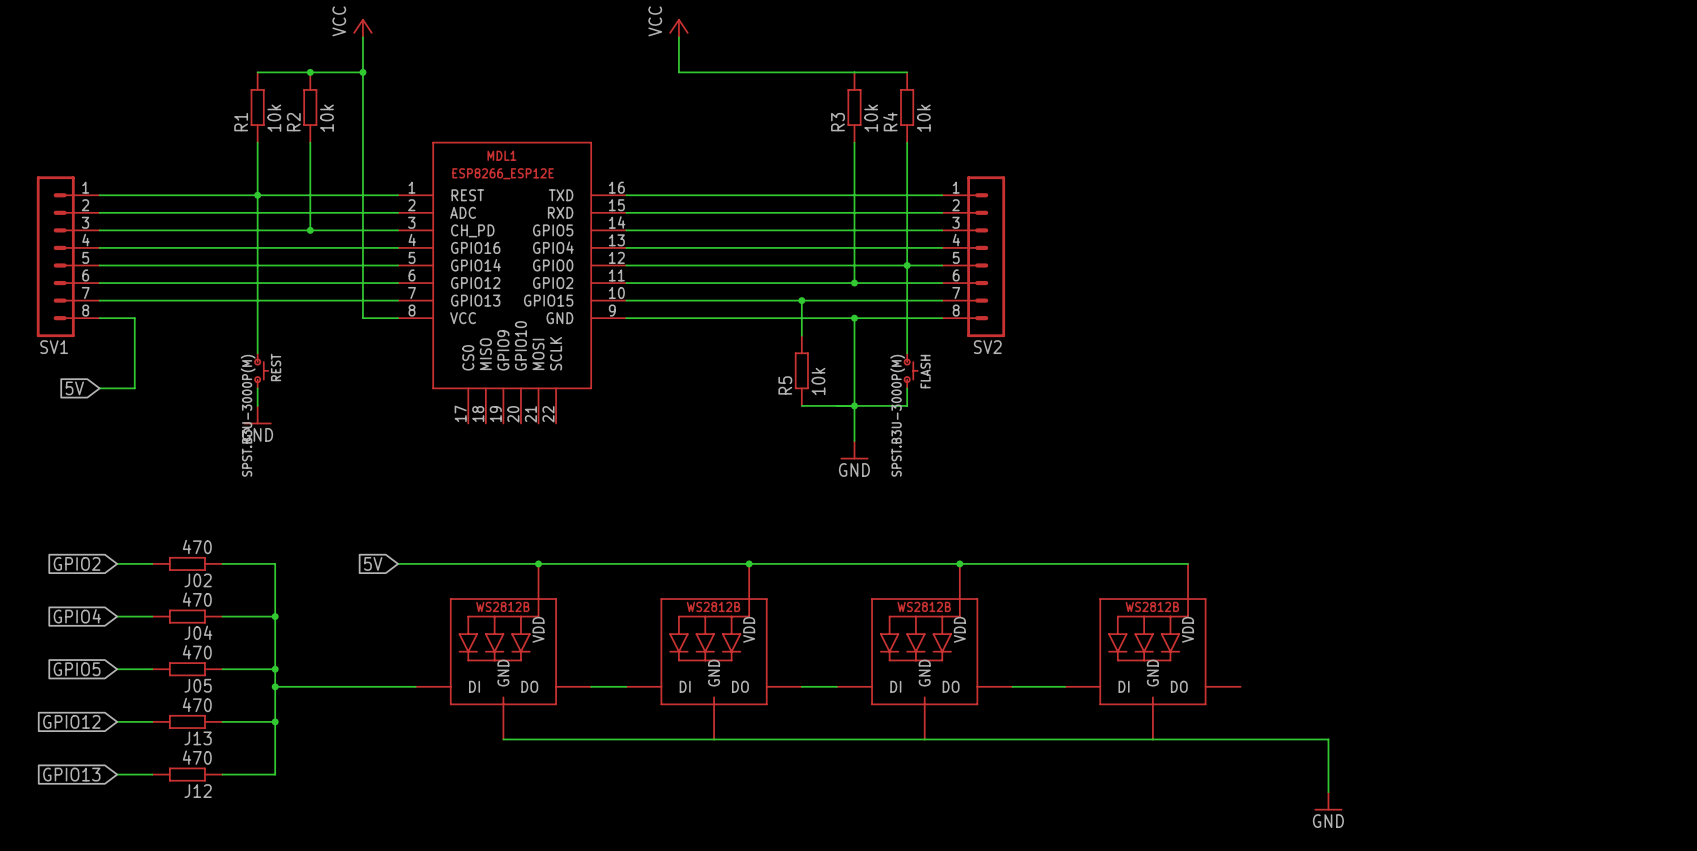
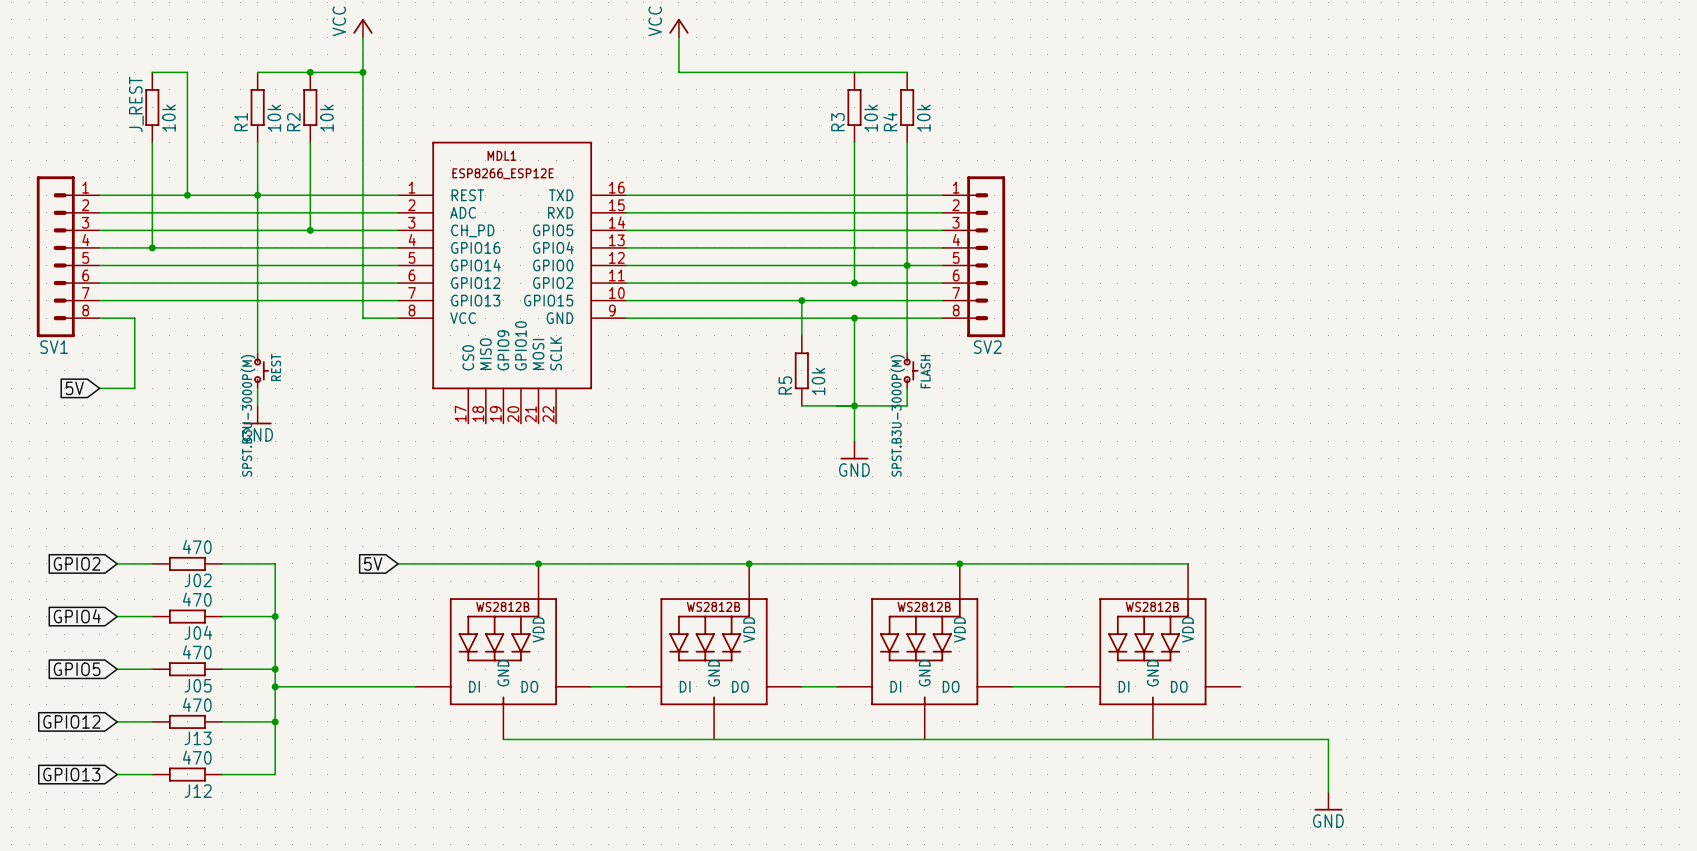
wire: none -> (152, 72) (187, 72) (187, 195)
J_REST: none -> 10k (152, 107)
wire: none -> (152, 142) (152, 247)
junction: none -> (187, 195)
junction: none -> (152, 247)

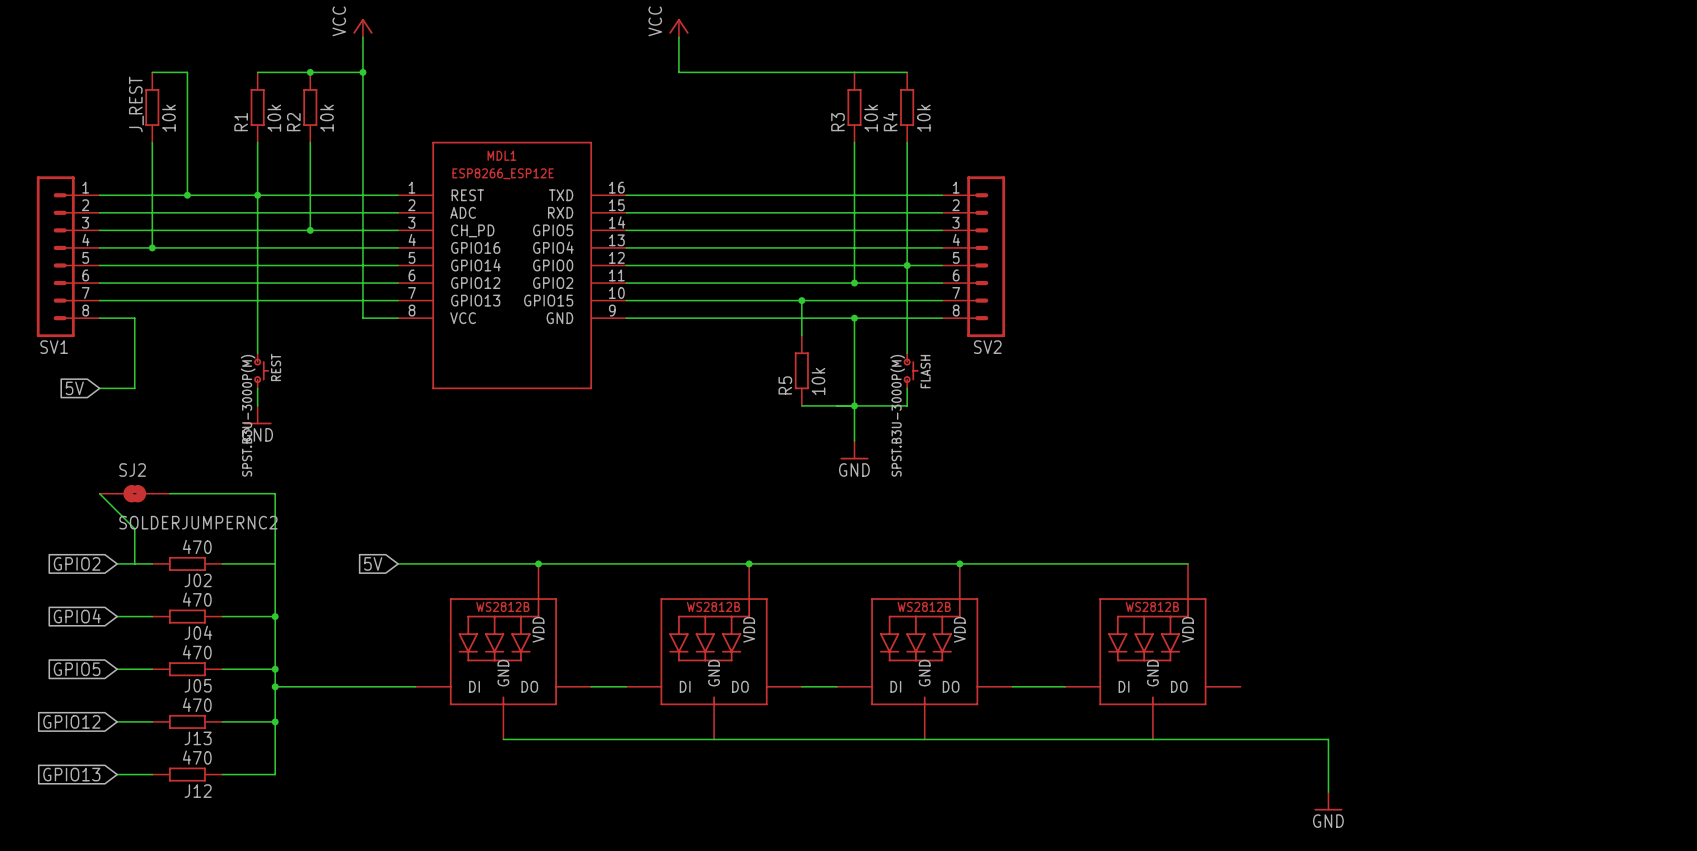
MDL1 symbol: [398, 141, 627, 424] -> [398, 141, 627, 390]
wire: none -> (99, 493) (134, 528) (134, 563)
SJ2: none -> SOLDERJUMPERNC2 (134, 493)
wire: none -> (169, 493) (275, 493) (275, 563)

